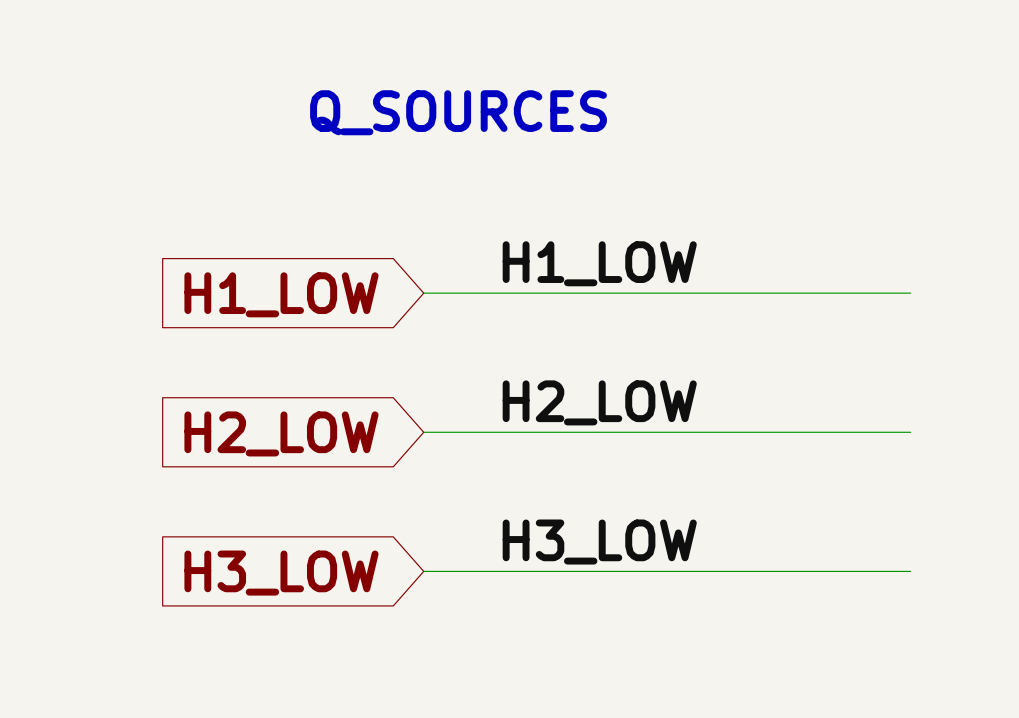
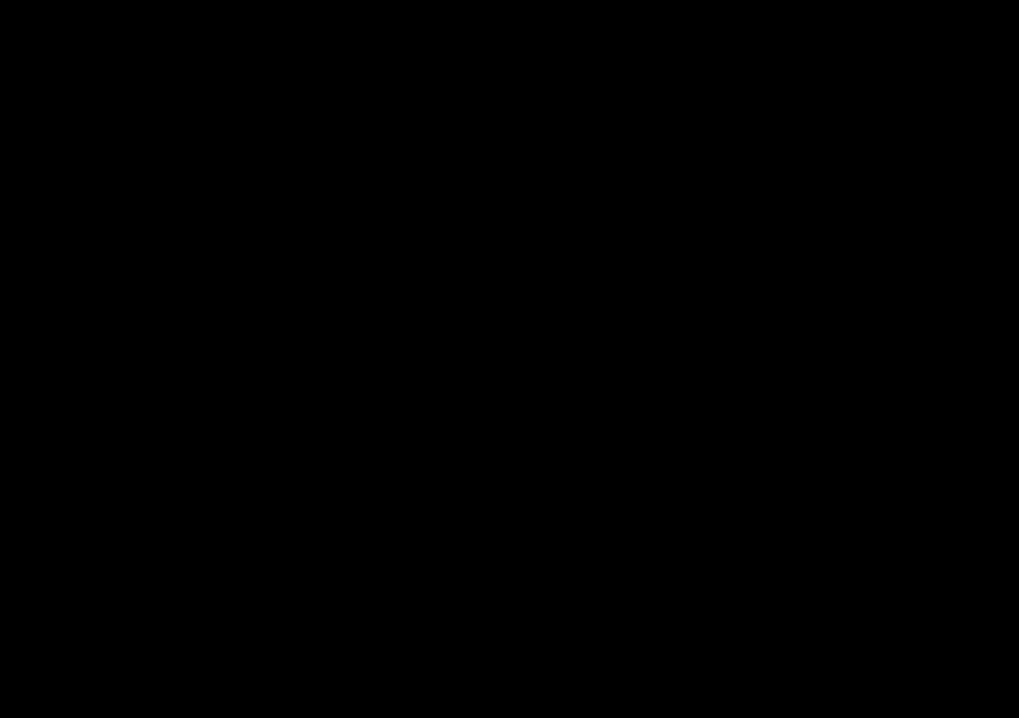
text: Q_SOURCES (458, 112) -> none
label: H1_LOW (599, 263) -> none
wire: (423, 293) (910, 293) -> none
global label: H1_LOW (281, 294) -> none
label: H2_LOW (599, 402) -> none
wire: (423, 432) (910, 432) -> none
global label: H2_LOW (281, 433) -> none
label: H3_LOW (599, 542) -> none
wire: (423, 571) (910, 571) -> none
global label: H3_LOW (281, 573) -> none

